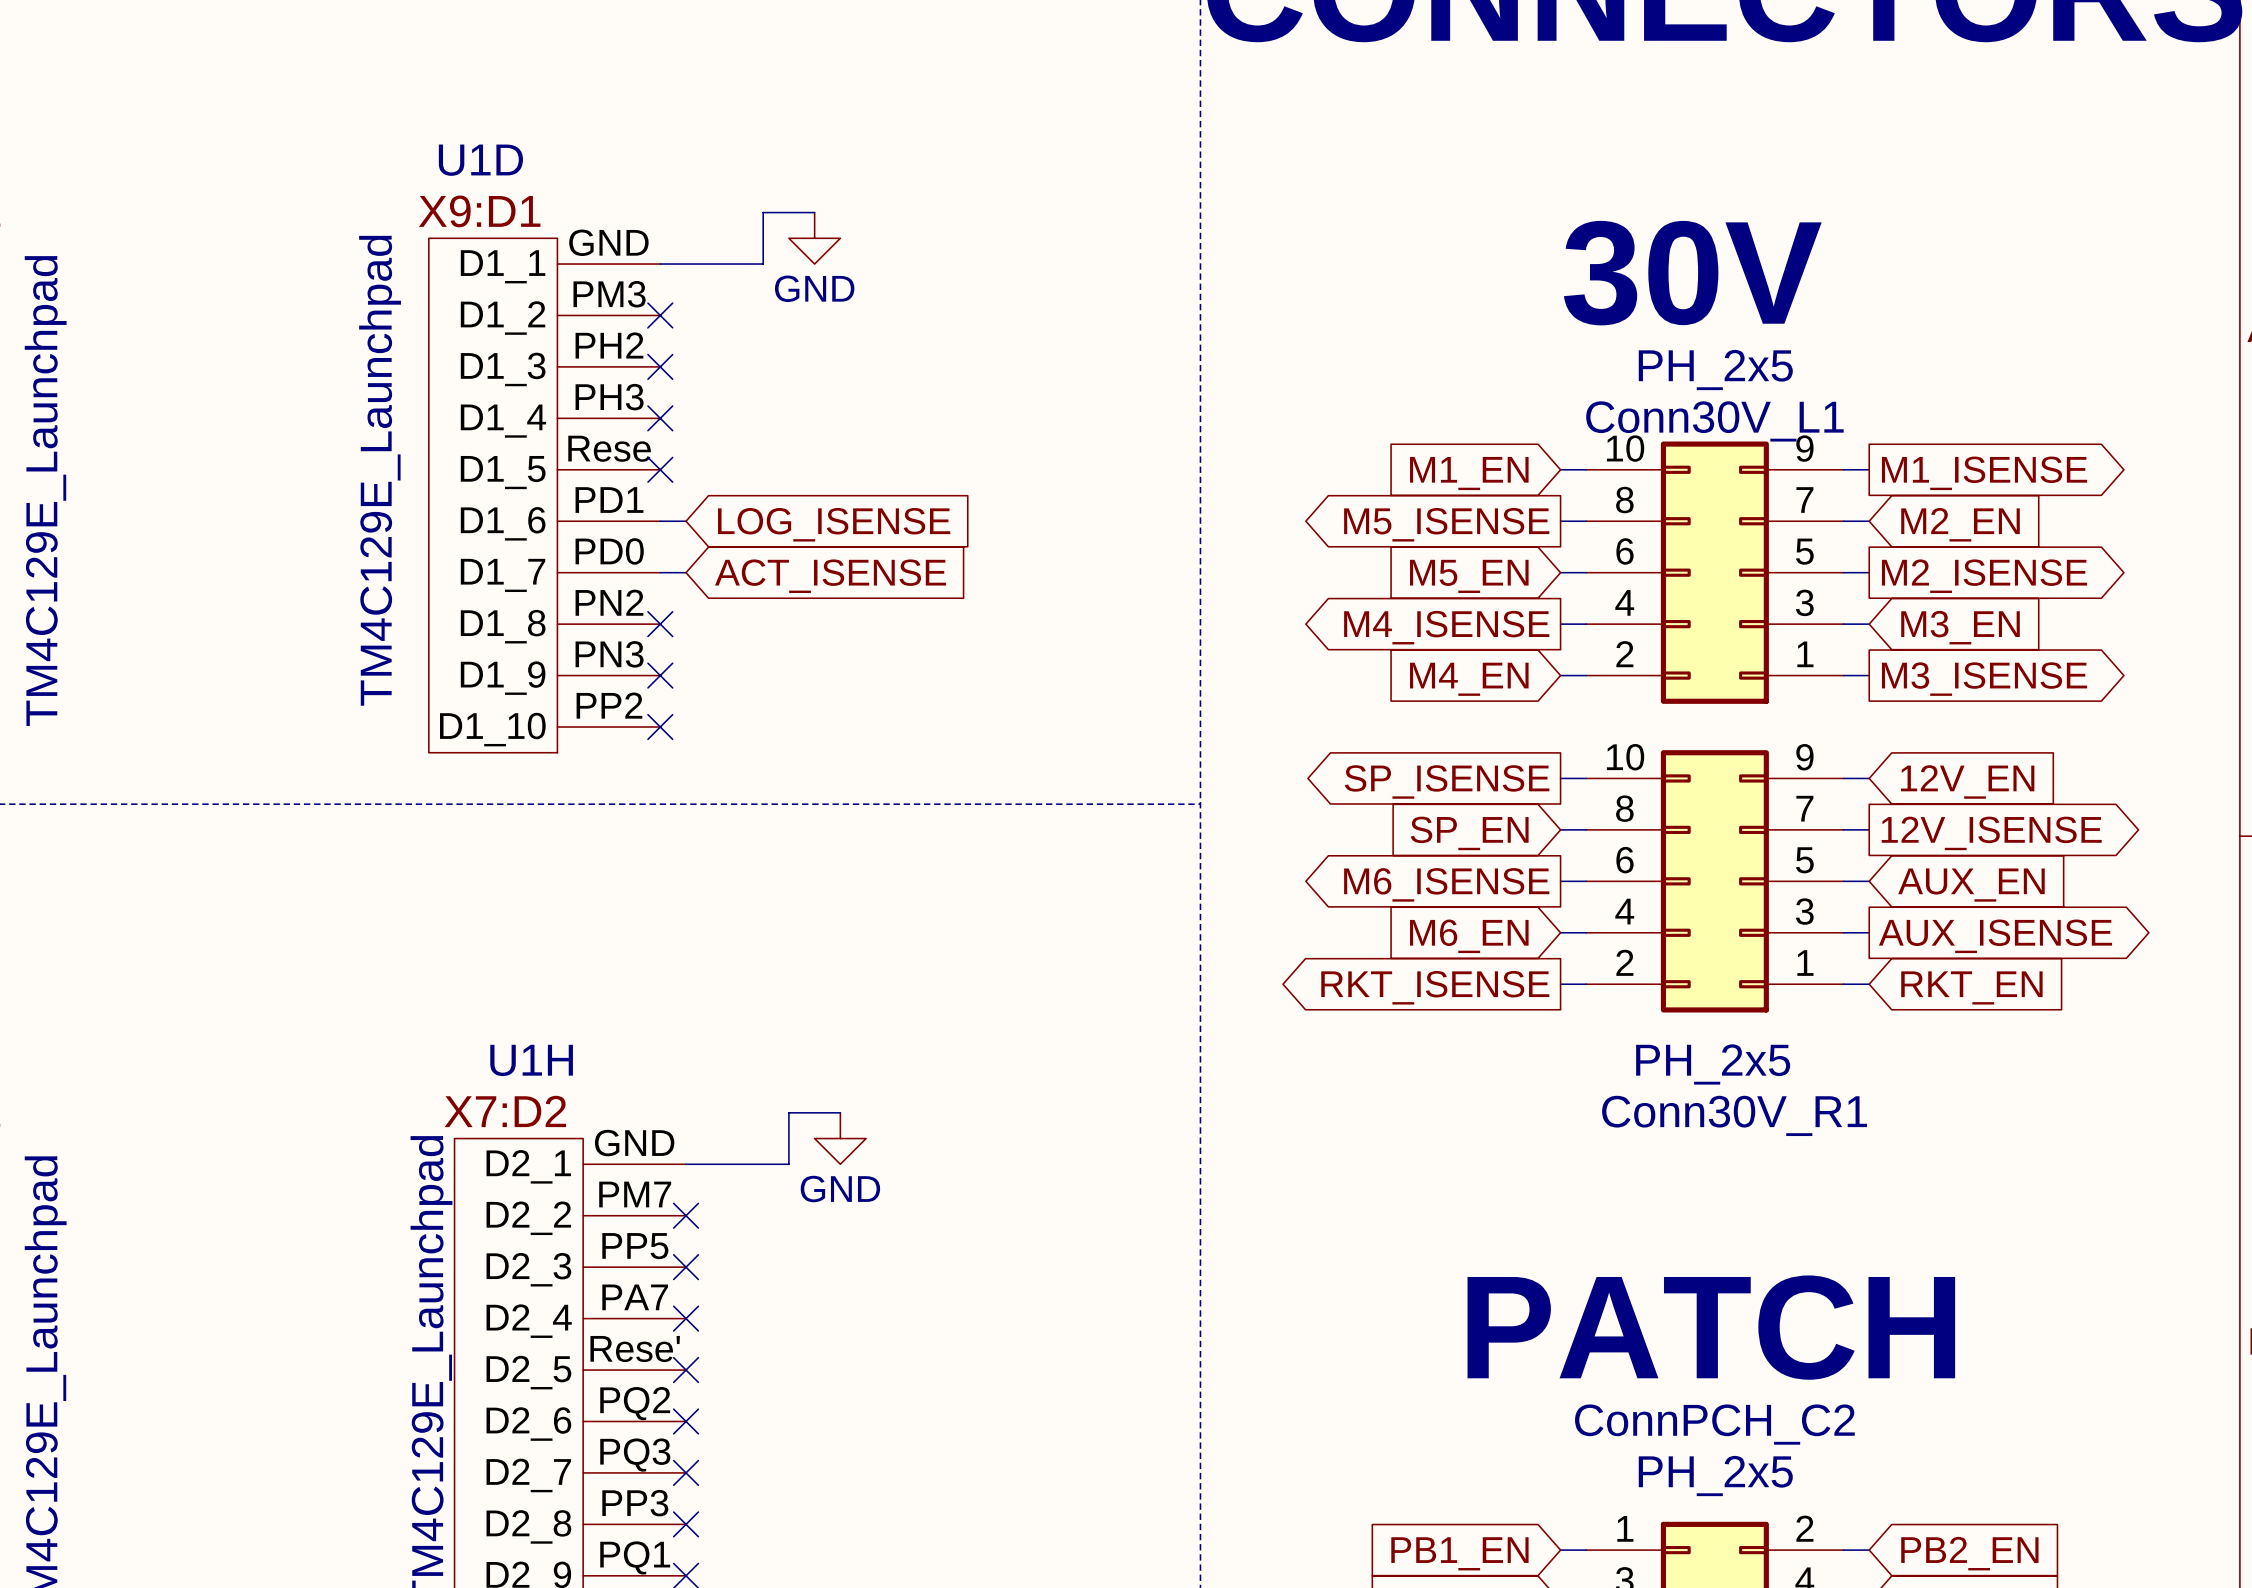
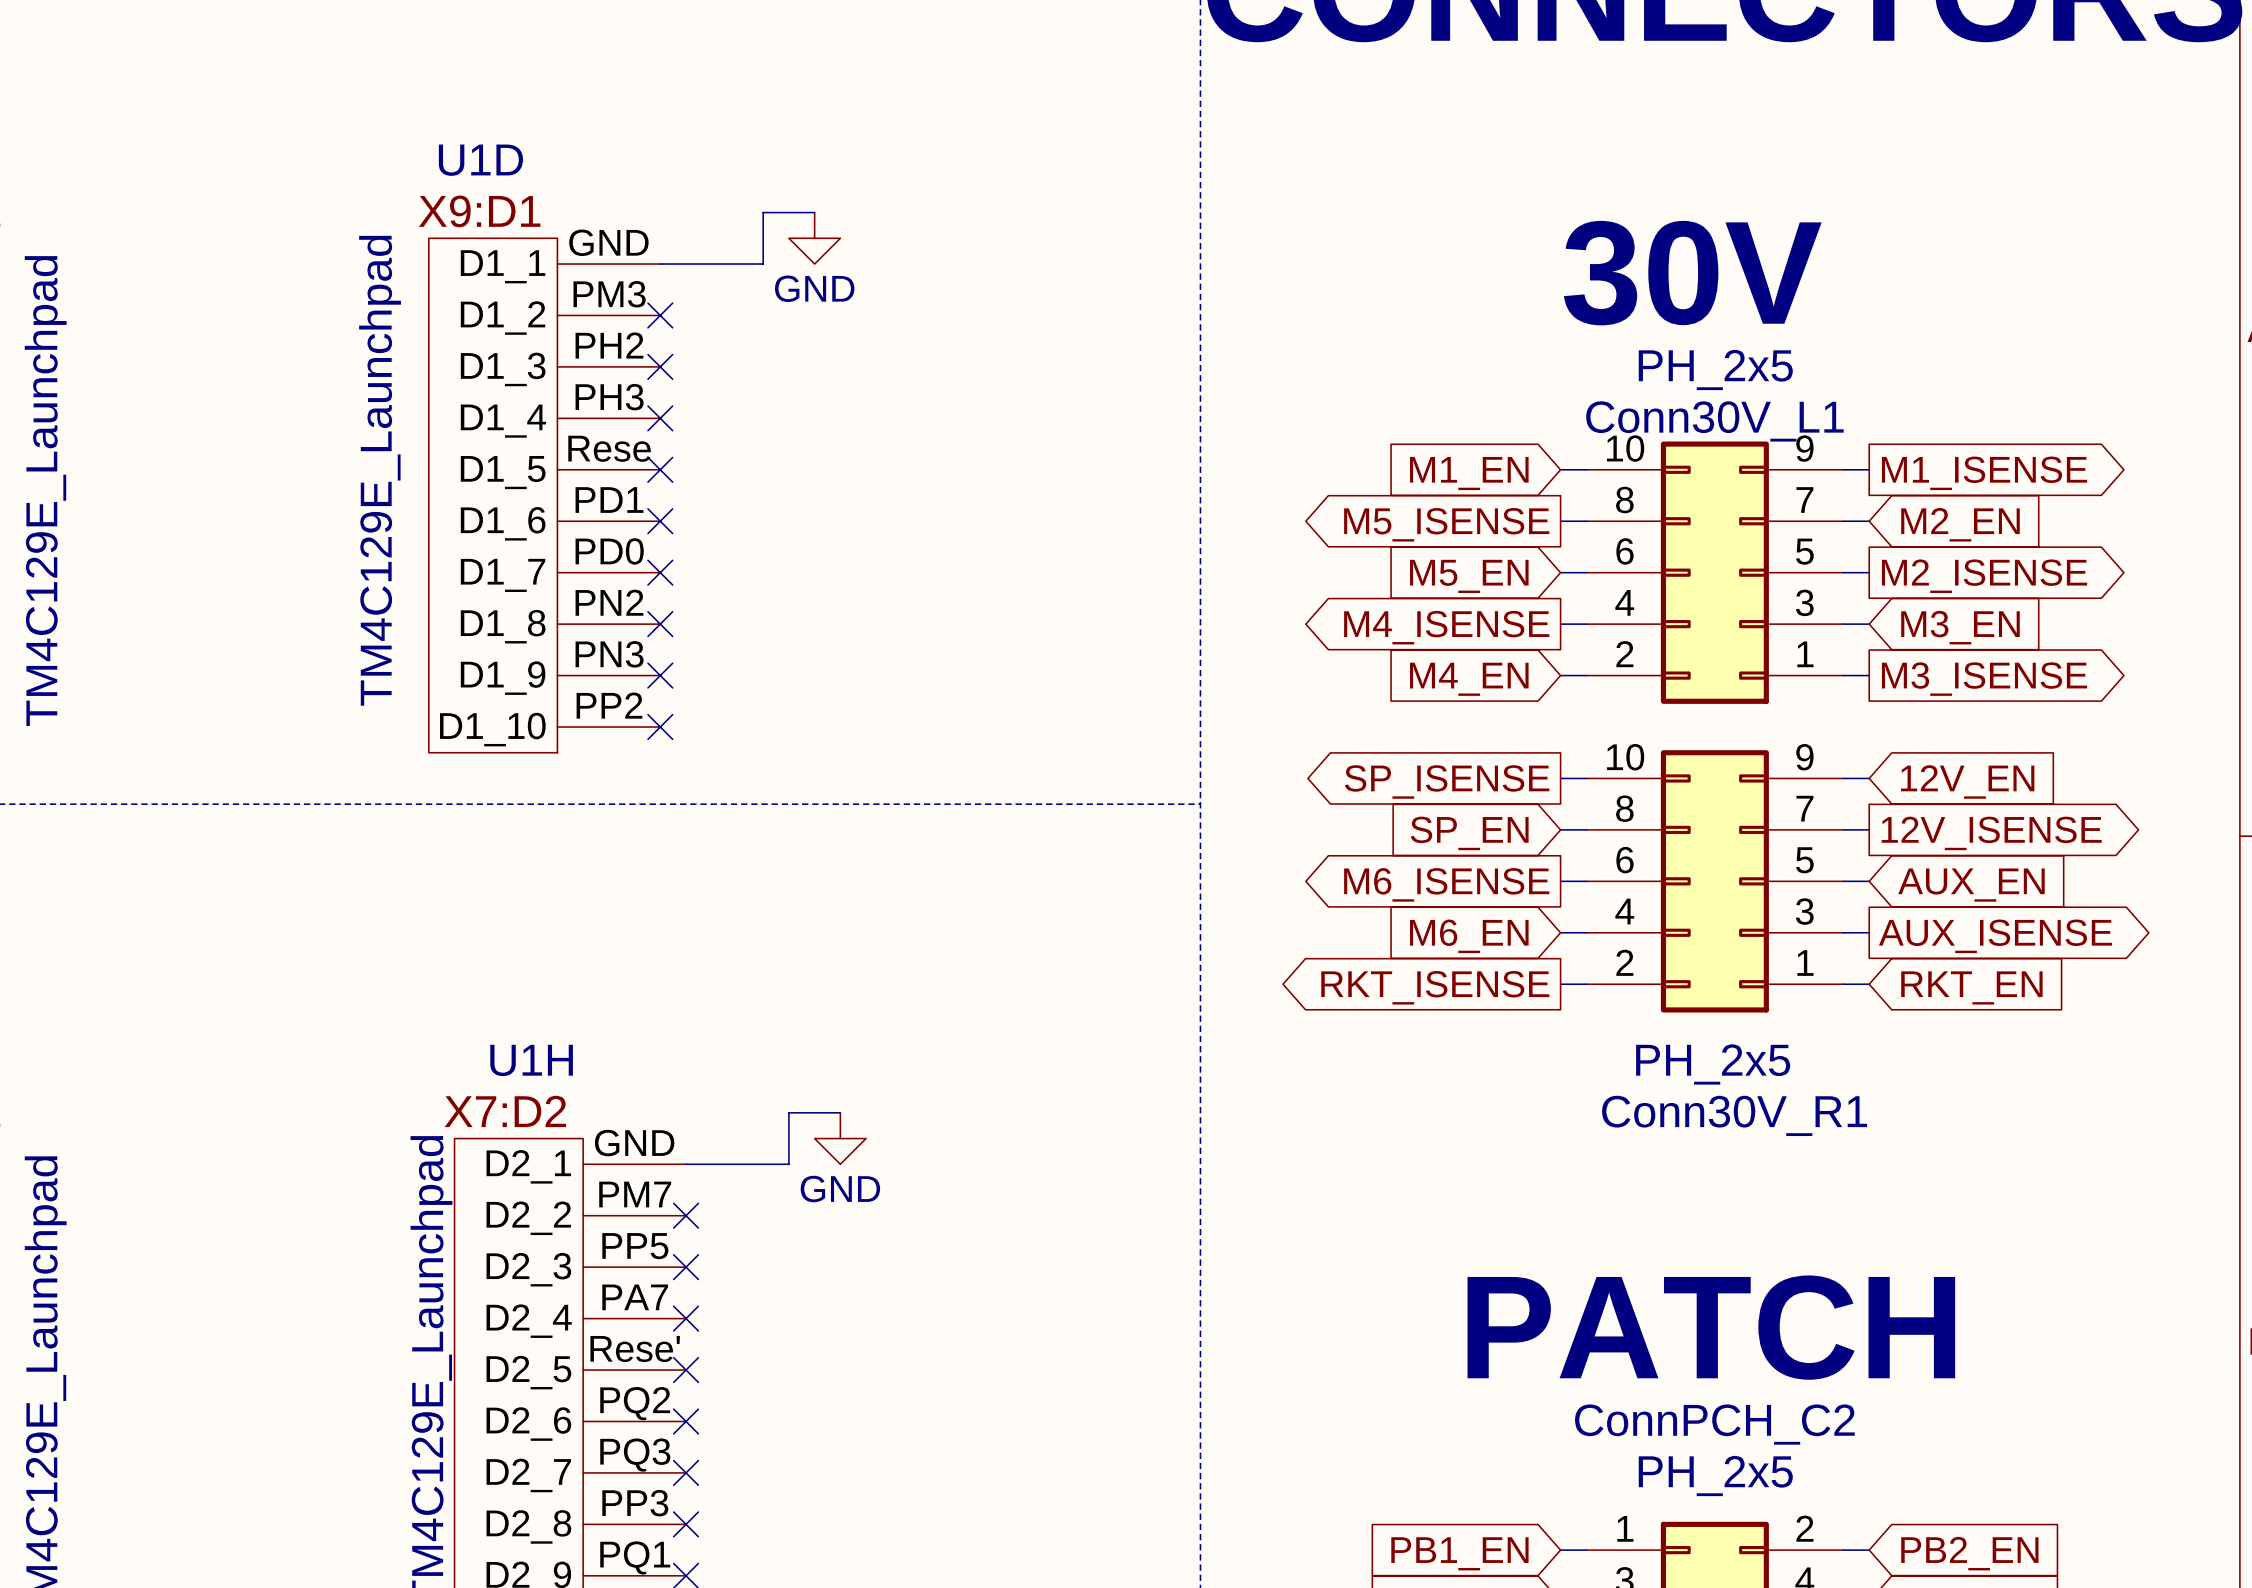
wire: (660, 521) (686, 521) -> none
no-connect mark: none -> (660, 521)
global label: LOG_ISENSE (834, 524) -> none
wire: (660, 572) (686, 572) -> none
no-connect mark: none -> (660, 572)
global label: ACT_ISENSE (830, 576) -> none

